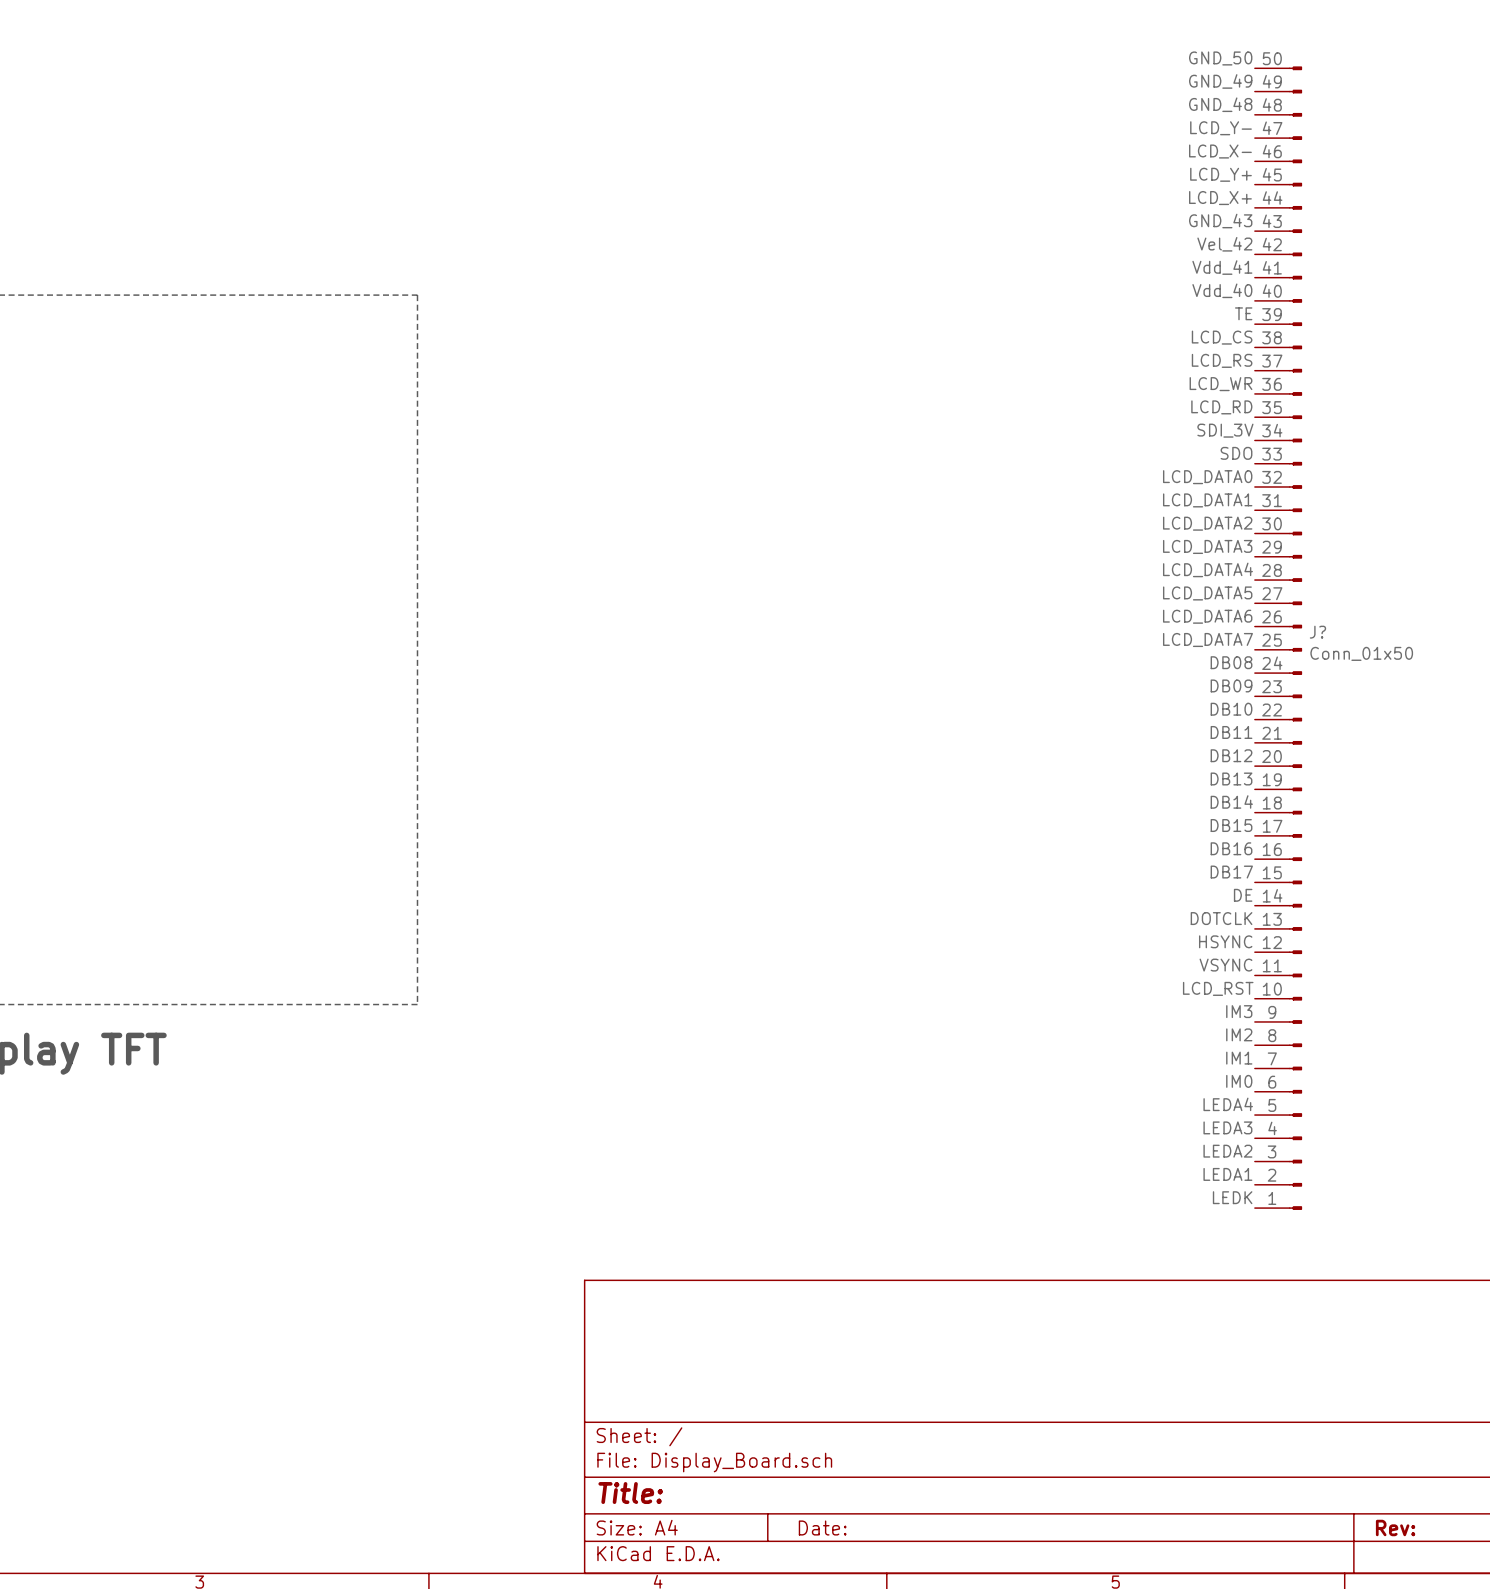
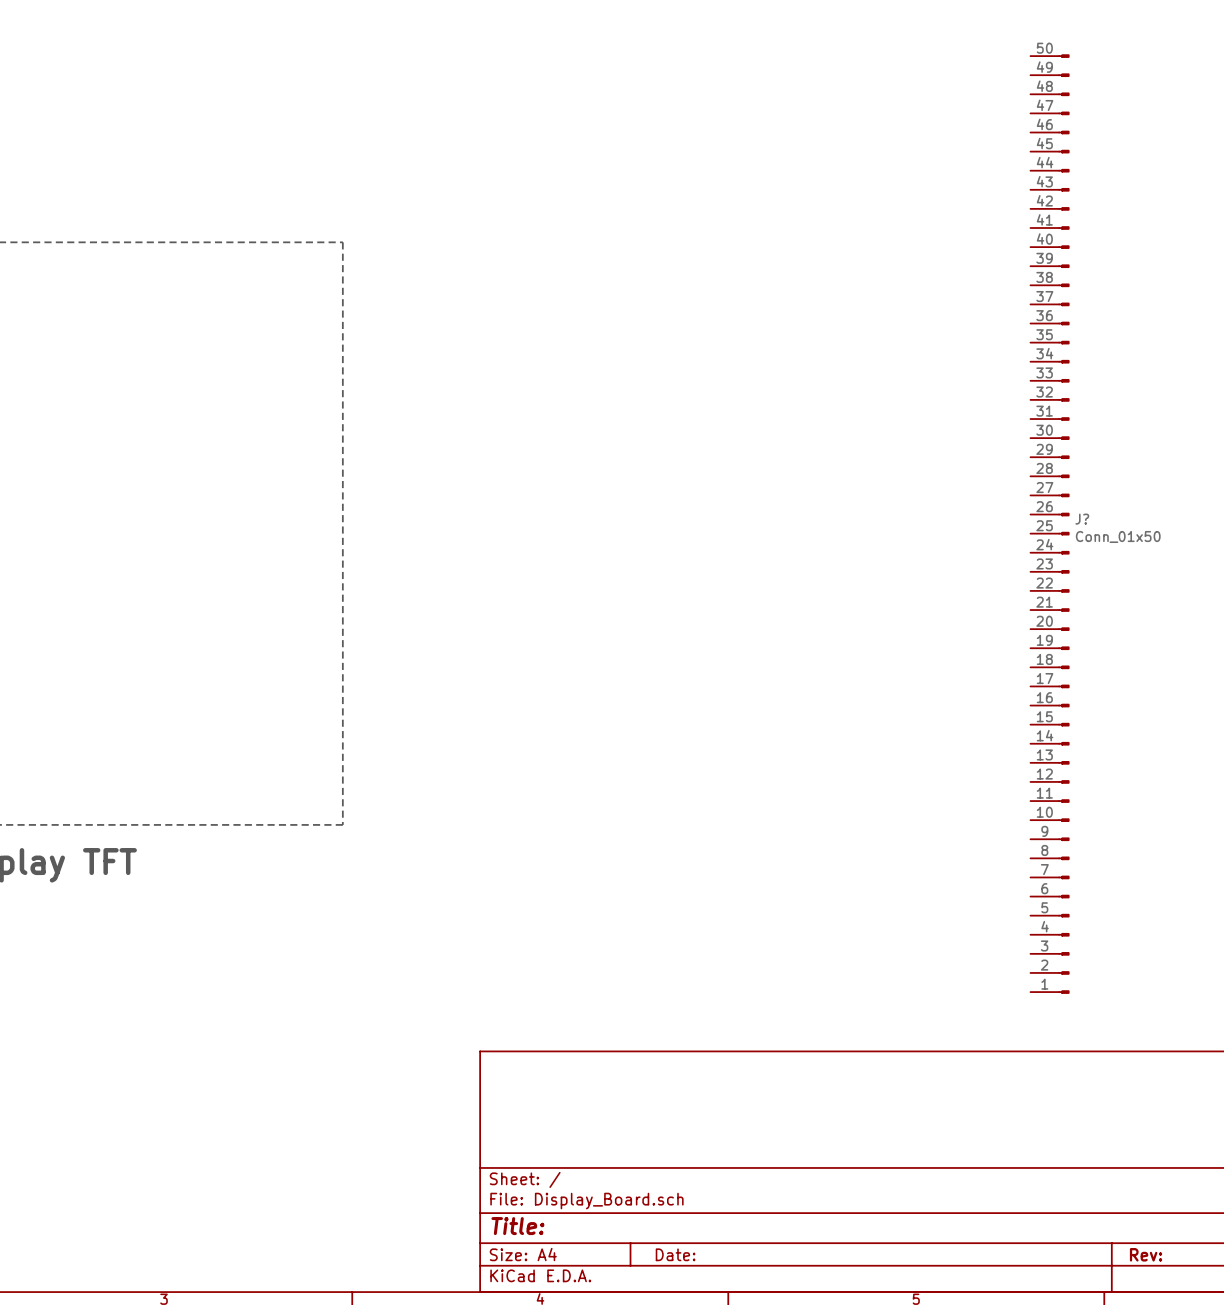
label: GND_50 (1220, 58) -> none
label: GND_49 (1220, 81) -> none
label: GND_48 (1220, 104) -> none
label: LCD_Y- (1220, 128) -> none
label: LCD_X- (1220, 151) -> none
label: LCD_Y+ (1220, 174) -> none
label: LCD_X+ (1220, 198) -> none
label: GND_43 (1220, 221) -> none
label: Vel_42 (1224, 244) -> none
label: Vdd_41 (1222, 267) -> none
label: Vdd_40 (1222, 290) -> none
label: TE (1243, 313) -> none
label: LCD_CS (1222, 337) -> none
label: LCD_RS (1222, 360) -> none
label: LCD_WR (1220, 384) -> none
label: LCD_RD (1221, 407) -> none
label: SDI_3V (1225, 430) -> none
label: SDO (1236, 453) -> none
label: LCD_DATA0 (1207, 477) -> none
label: LCD_DATA1 (1207, 500) -> none
label: LCD_DATA2 (1207, 523) -> none
label: LCD_DATA3 (1207, 546) -> none
label: LCD_DATA4 (1207, 569) -> none
label: LCD_DATA5 (1207, 593) -> none
label: LCD_DATA6 (1207, 616) -> none
label: LCD_DATA7 (1207, 639) -> none
label: DB08 (1231, 662) -> none
label: DB09 (1231, 685) -> none
label: DB10 (1231, 709) -> none
label: DB11 (1231, 732) -> none
label: DB12 (1231, 755) -> none
label: DB13 (1231, 779) -> none
label: DB14 (1231, 801) -> none
label: DB15 (1231, 825) -> none
label: DB16 (1231, 848) -> none
label: DB17 (1231, 872) -> none
label: DE (1243, 895) -> none
label: DOTCLK (1221, 918) -> none
label: HSYNC (1225, 941) -> none
label: VSYNC (1225, 965) -> none
label: LCD_RST (1218, 988) -> none
label: IM3 (1239, 1011) -> none
label: IM2 (1239, 1034) -> none
label: IM1 (1239, 1058) -> none
label: IM0 (1239, 1081) -> none
label: LEDA4 (1228, 1104) -> none
label: LEDA3 (1227, 1127) -> none
label: LEDA2 (1227, 1151) -> none
label: LEDA1 (1227, 1174) -> none
label: LEDK (1232, 1197) -> none

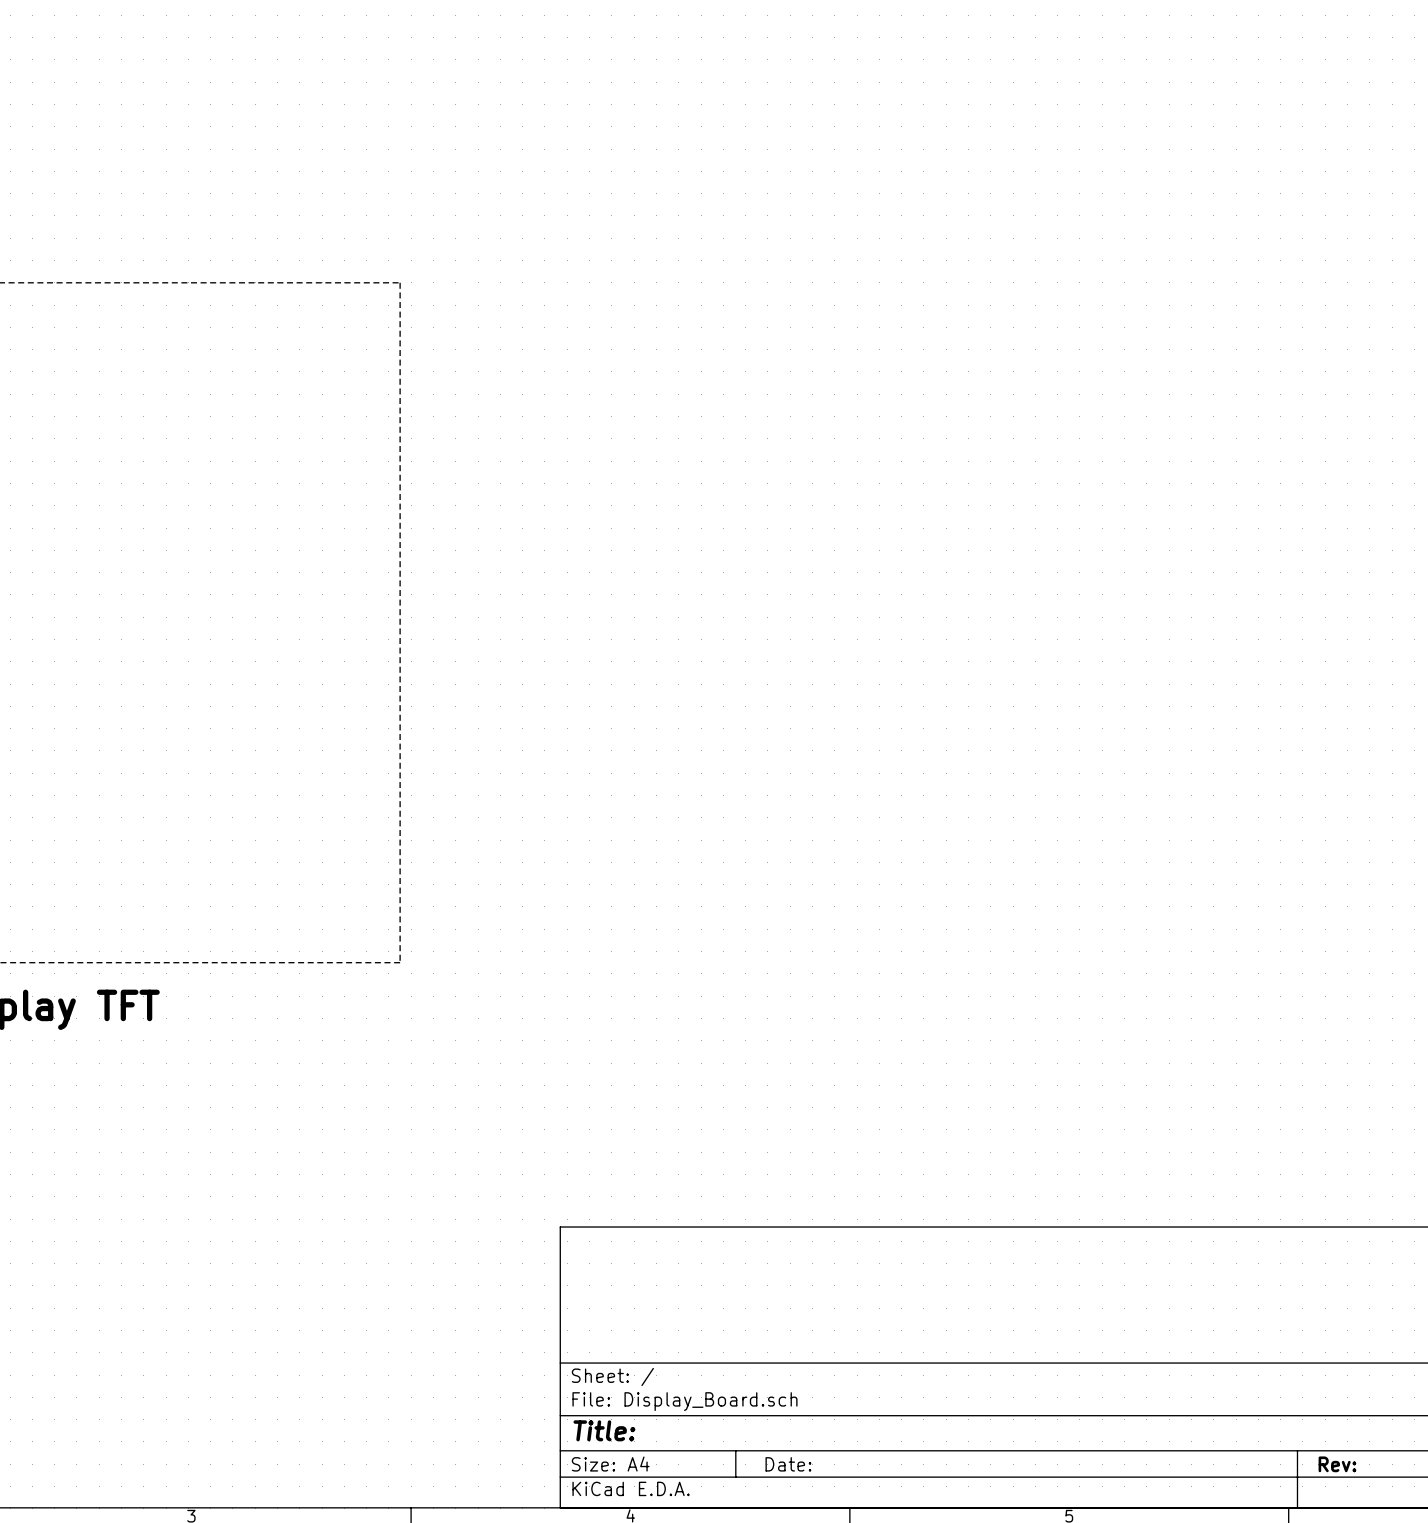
J?: Conn_01x50 (1049, 524) -> none

